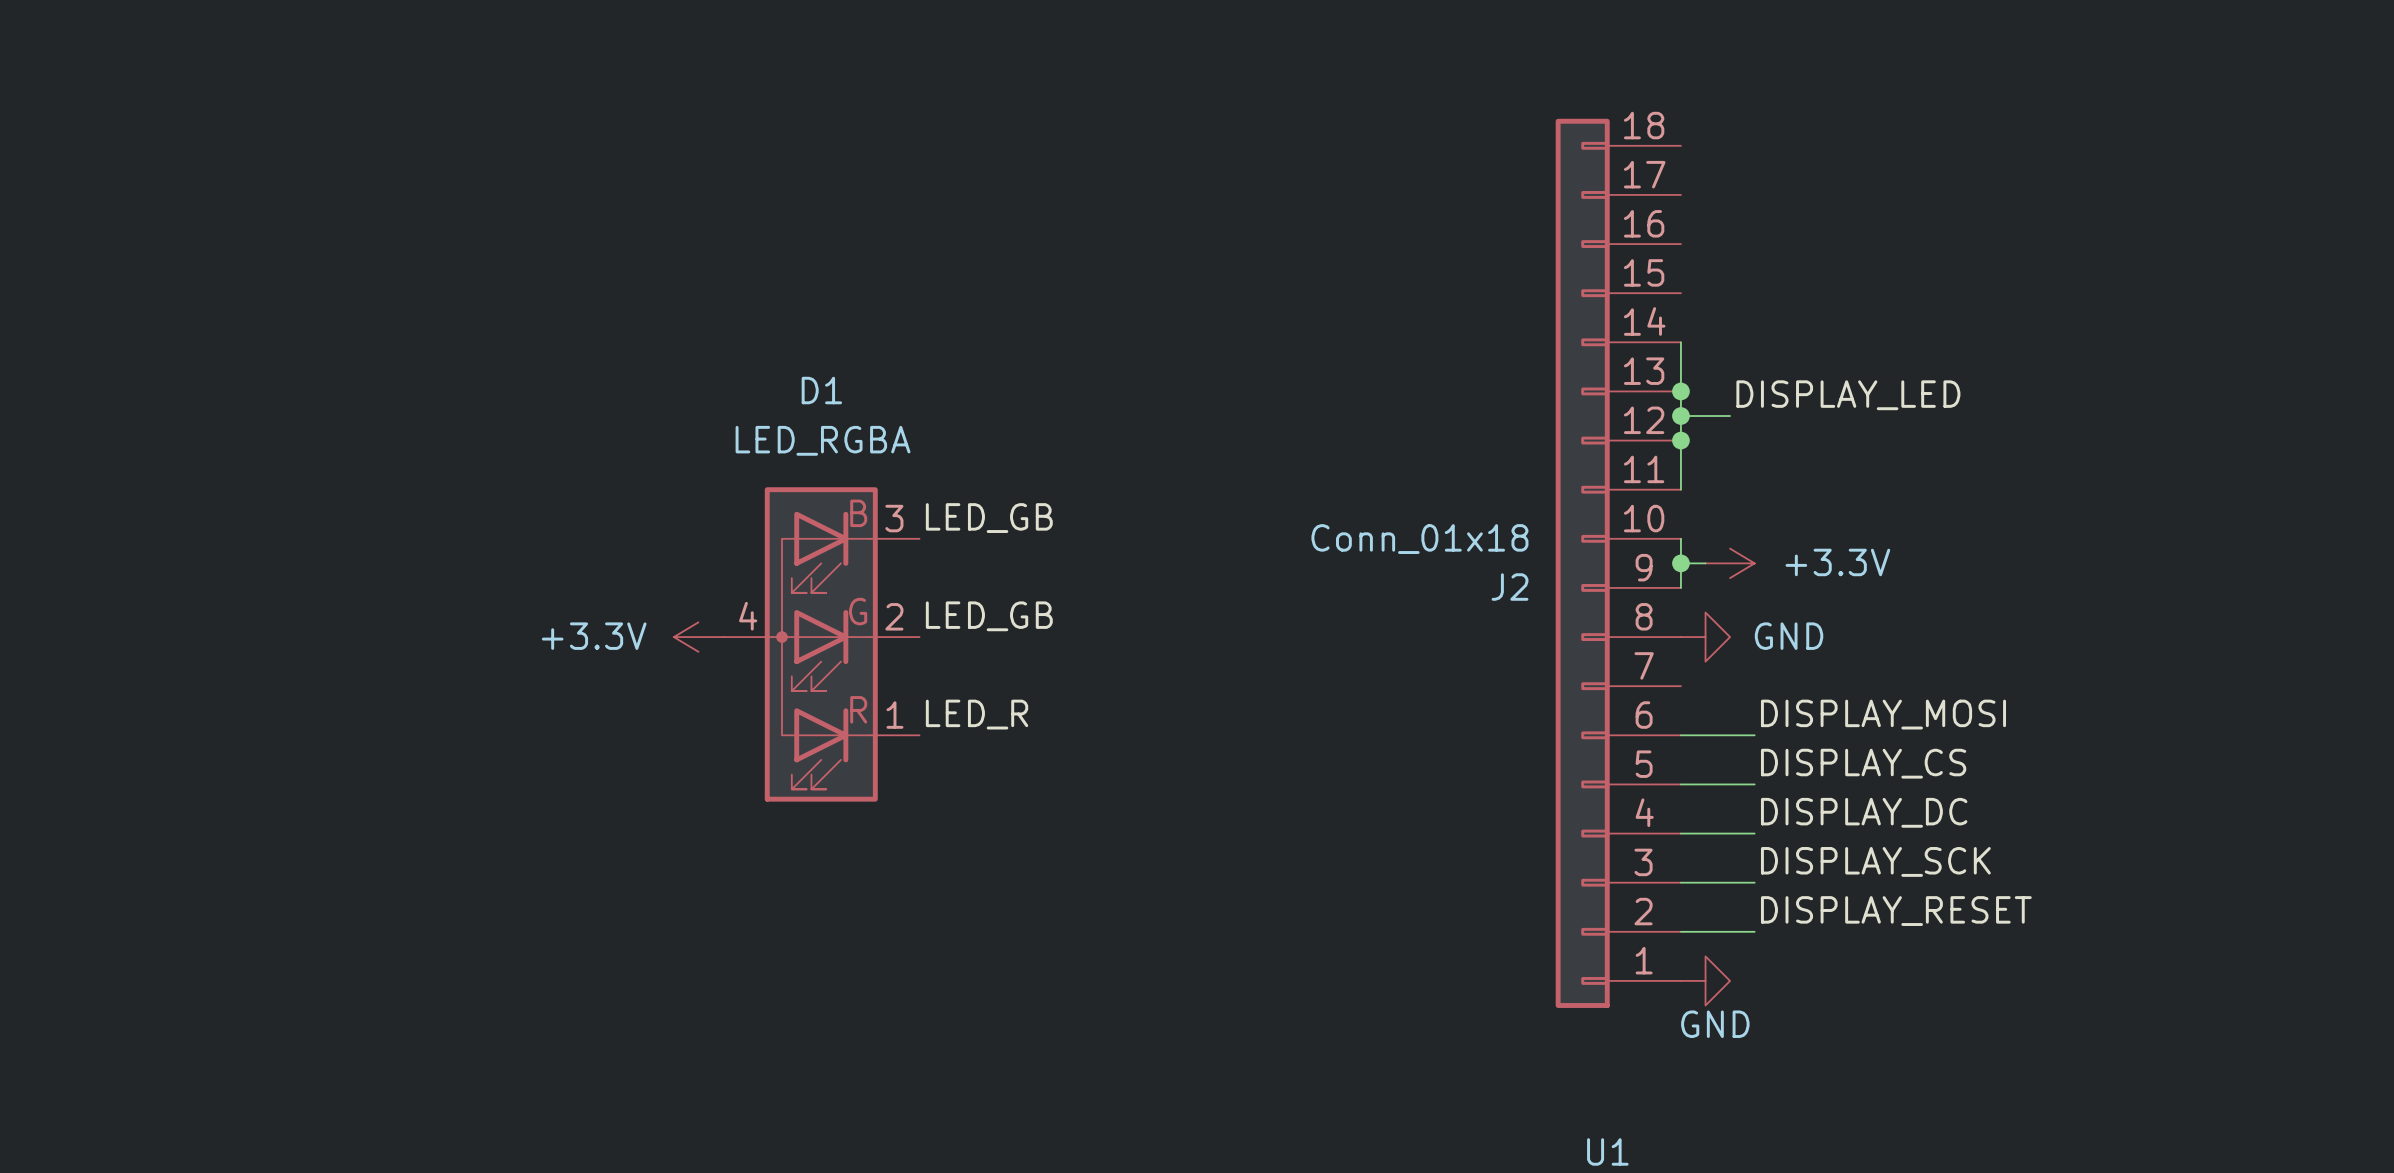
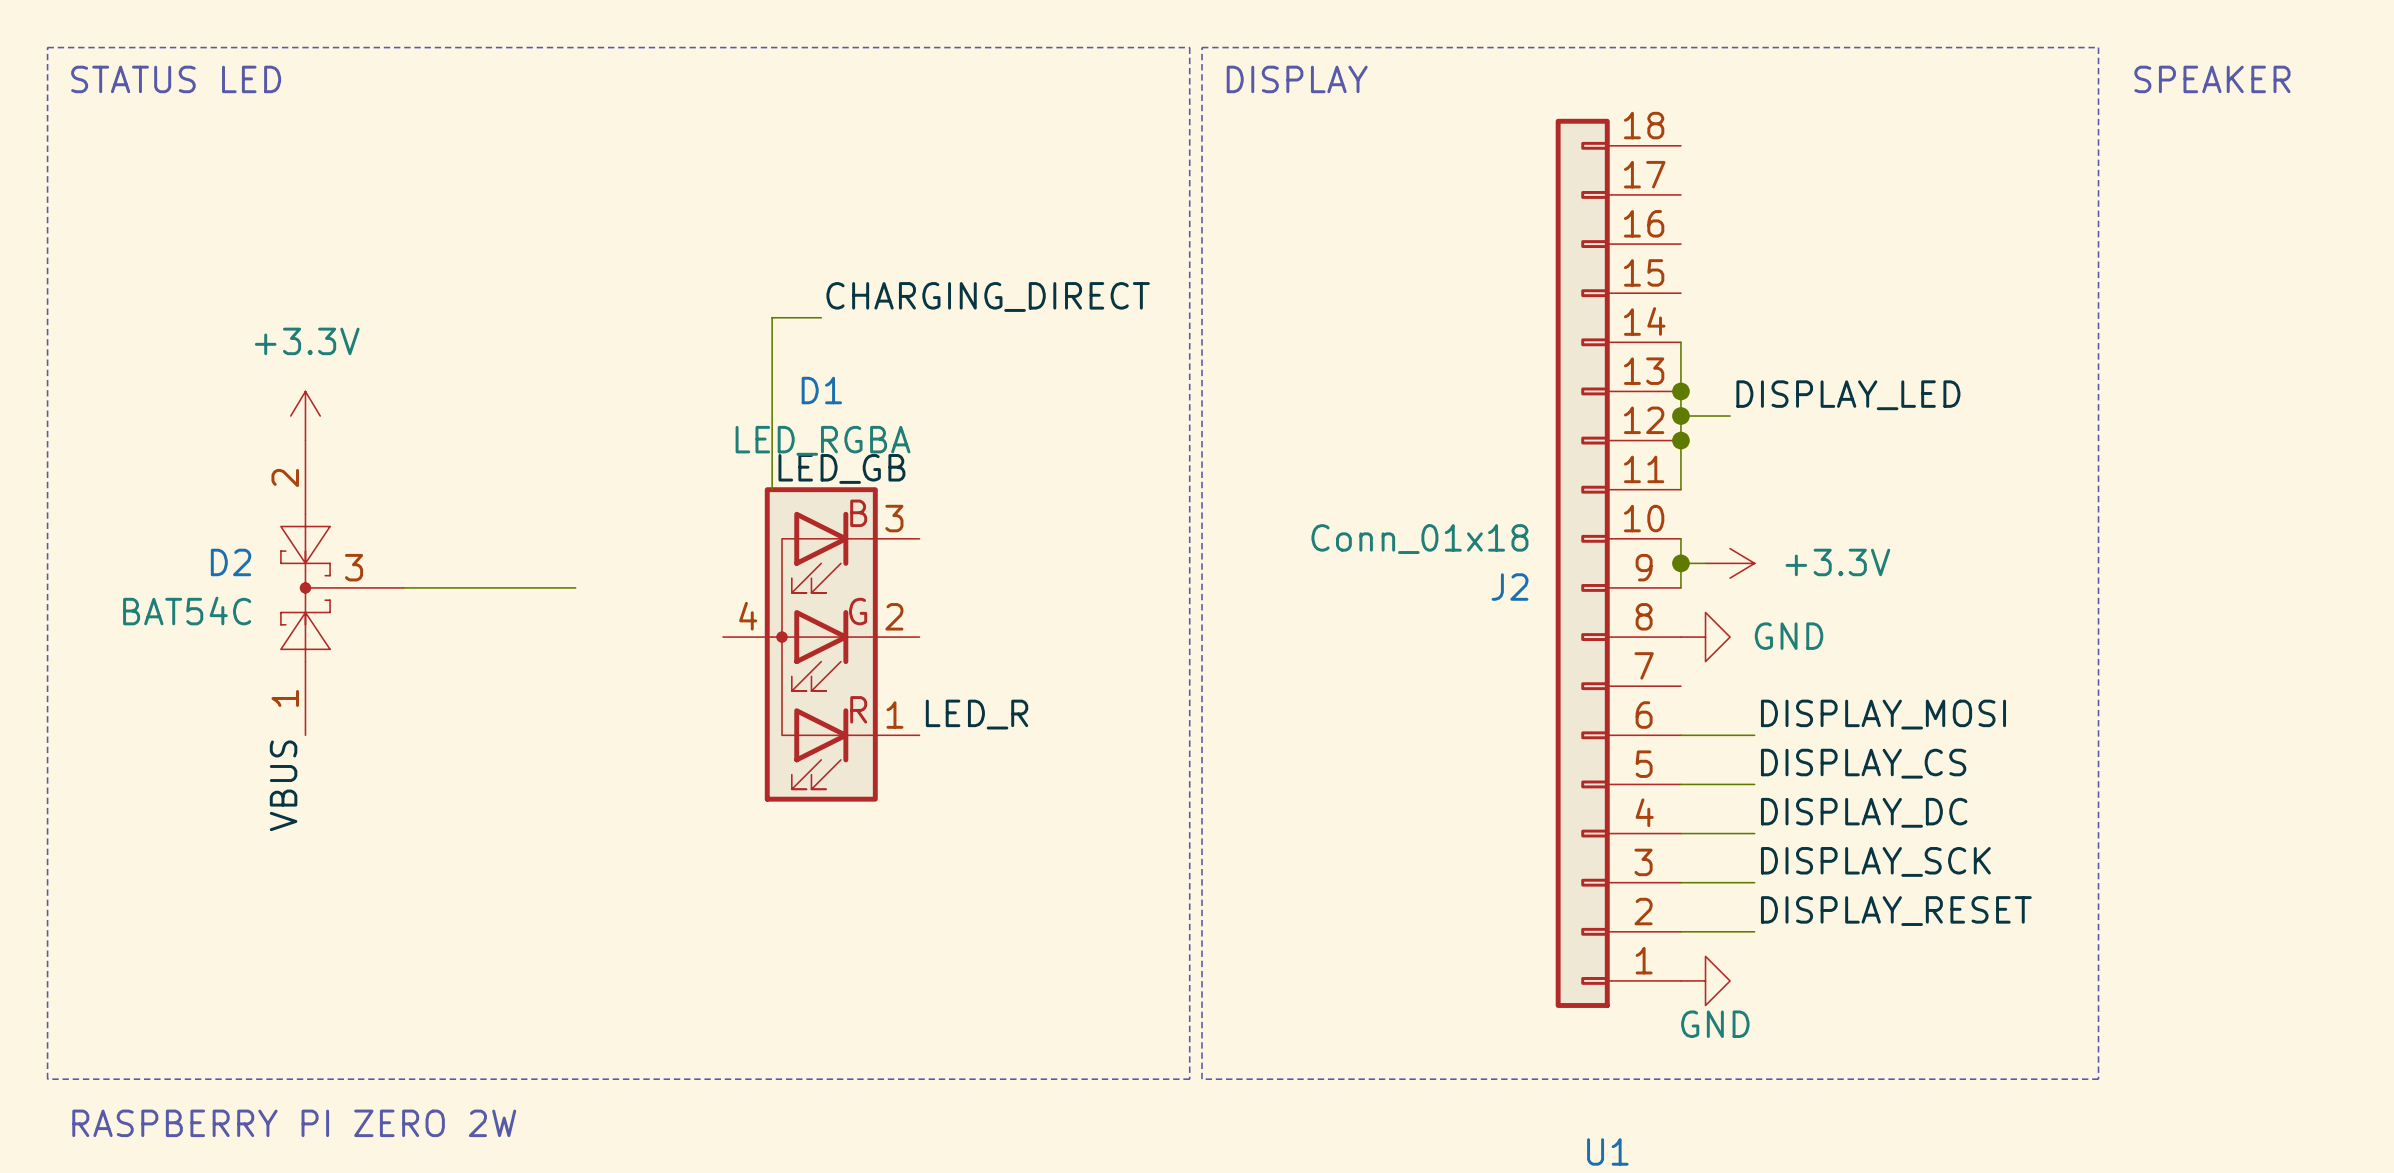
line: none -> (47, 47) (1189, 47) (1189, 1079) (47, 1079) (47, 47)
line: none -> (1201, 47) (2098, 47) (2098, 1079) (1201, 1079) (1201, 47)
text: none -> STATUS LED (176, 79)
text: none -> DISPLAY (1297, 79)
text: none -> SPEAKER (2212, 79)
label: none -> CHARGING_DIRECT (988, 297)
wire: none -> (821, 317) (772, 317) (772, 489)
label position: LED_GB (989, 518) -> LED_GB (841, 468)
D2: none -> BAT54C (342, 587)
wire: none -> (403, 587) (575, 587)
label: LED_GB (989, 616) -> none
power symbol text position: +3.3V (594, 636) -> +3.3V (307, 341)
power symbol rotation: 0° (698, 637) -> 90° clockwise (305, 416)
power symbol position: +3.3V (698, 637) -> +3.3V (305, 416)
label: none -> VBUS (283, 785)
text: none -> RASPBERRY PI ZERO 2W (294, 1123)

